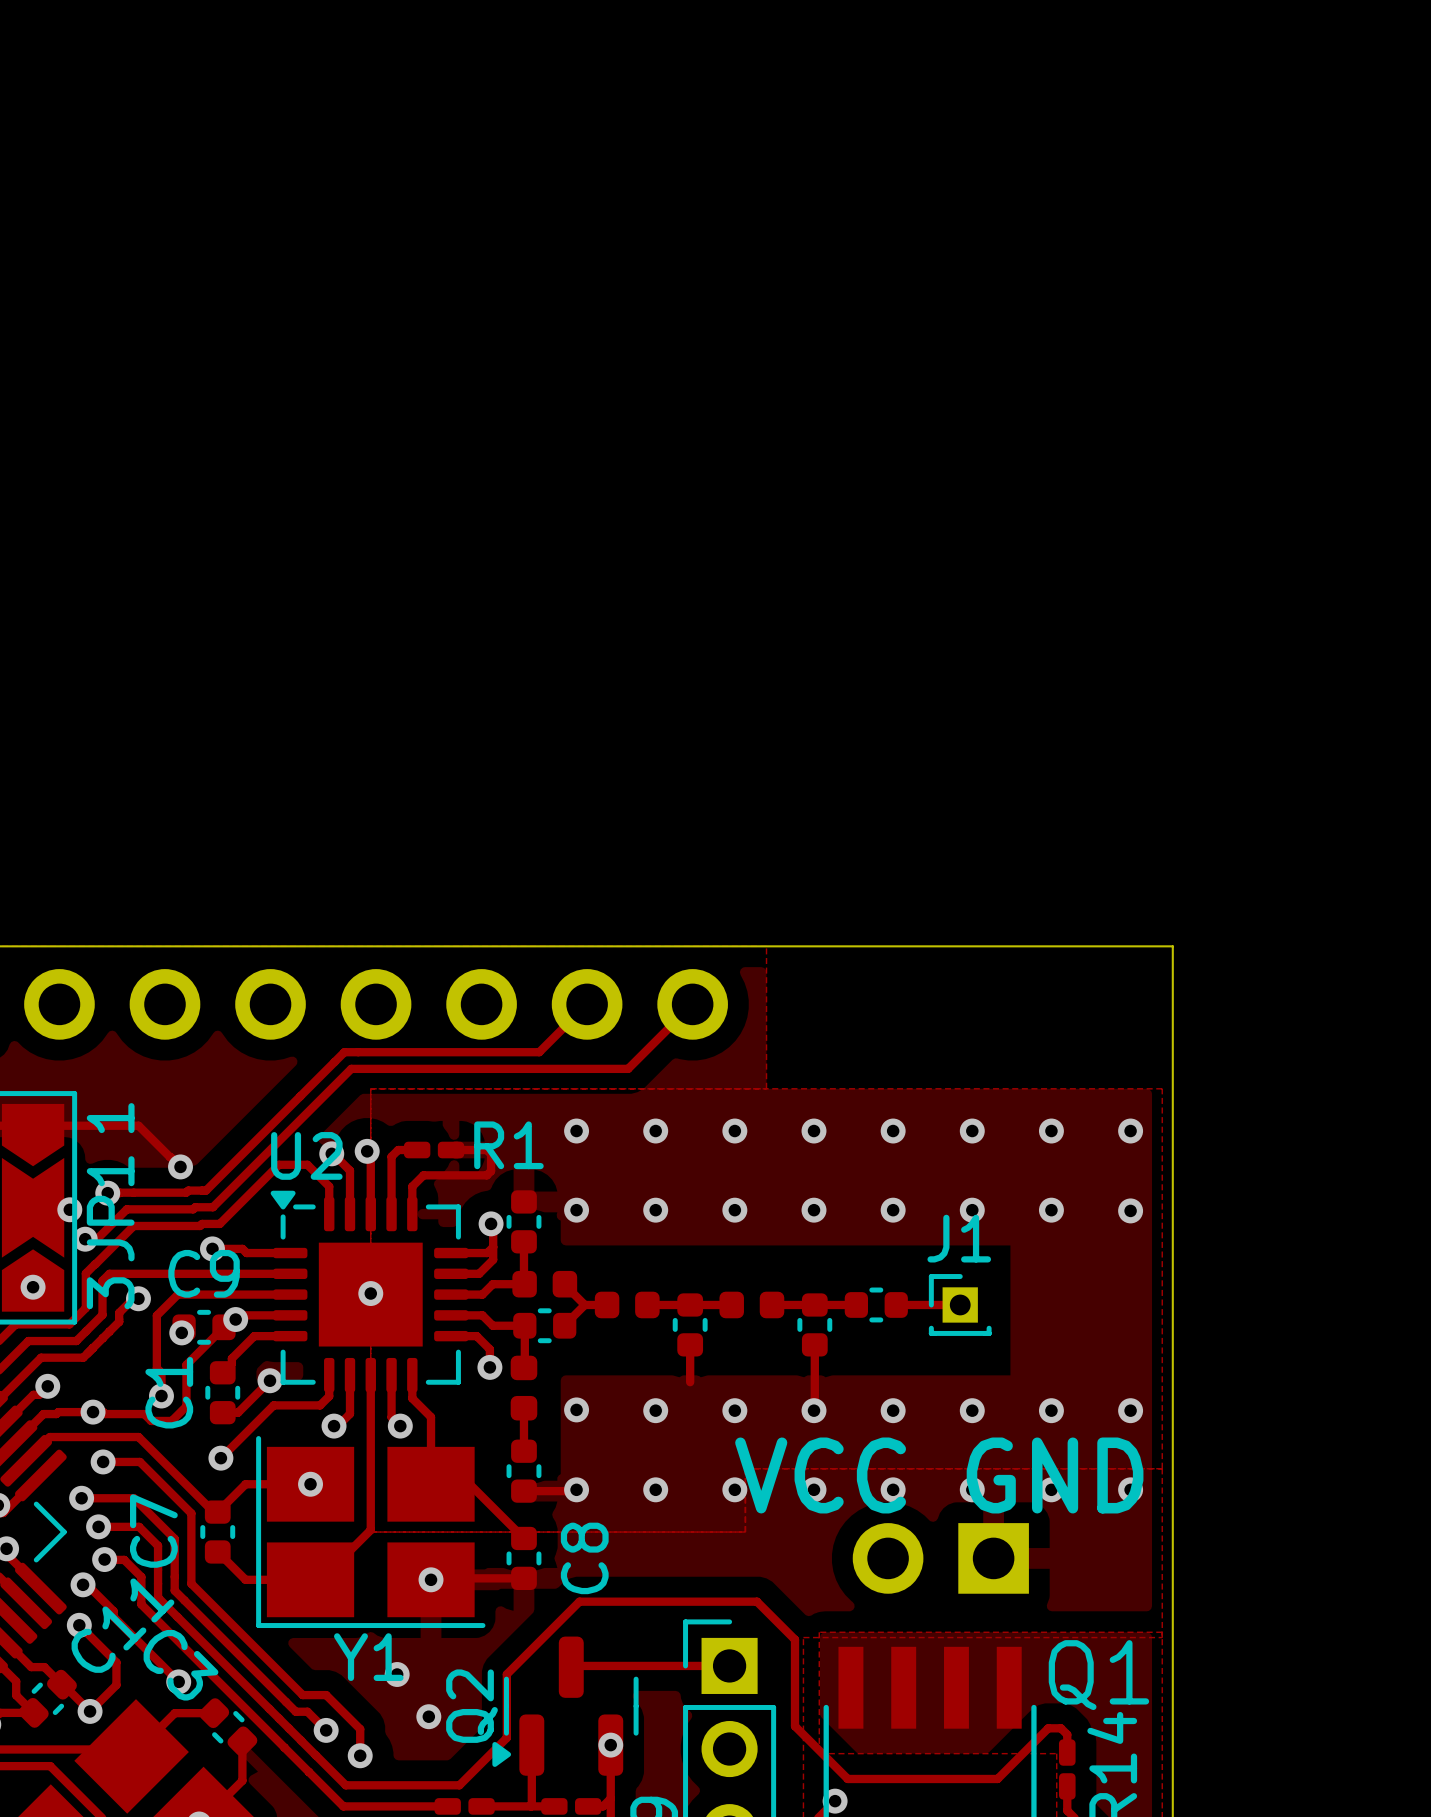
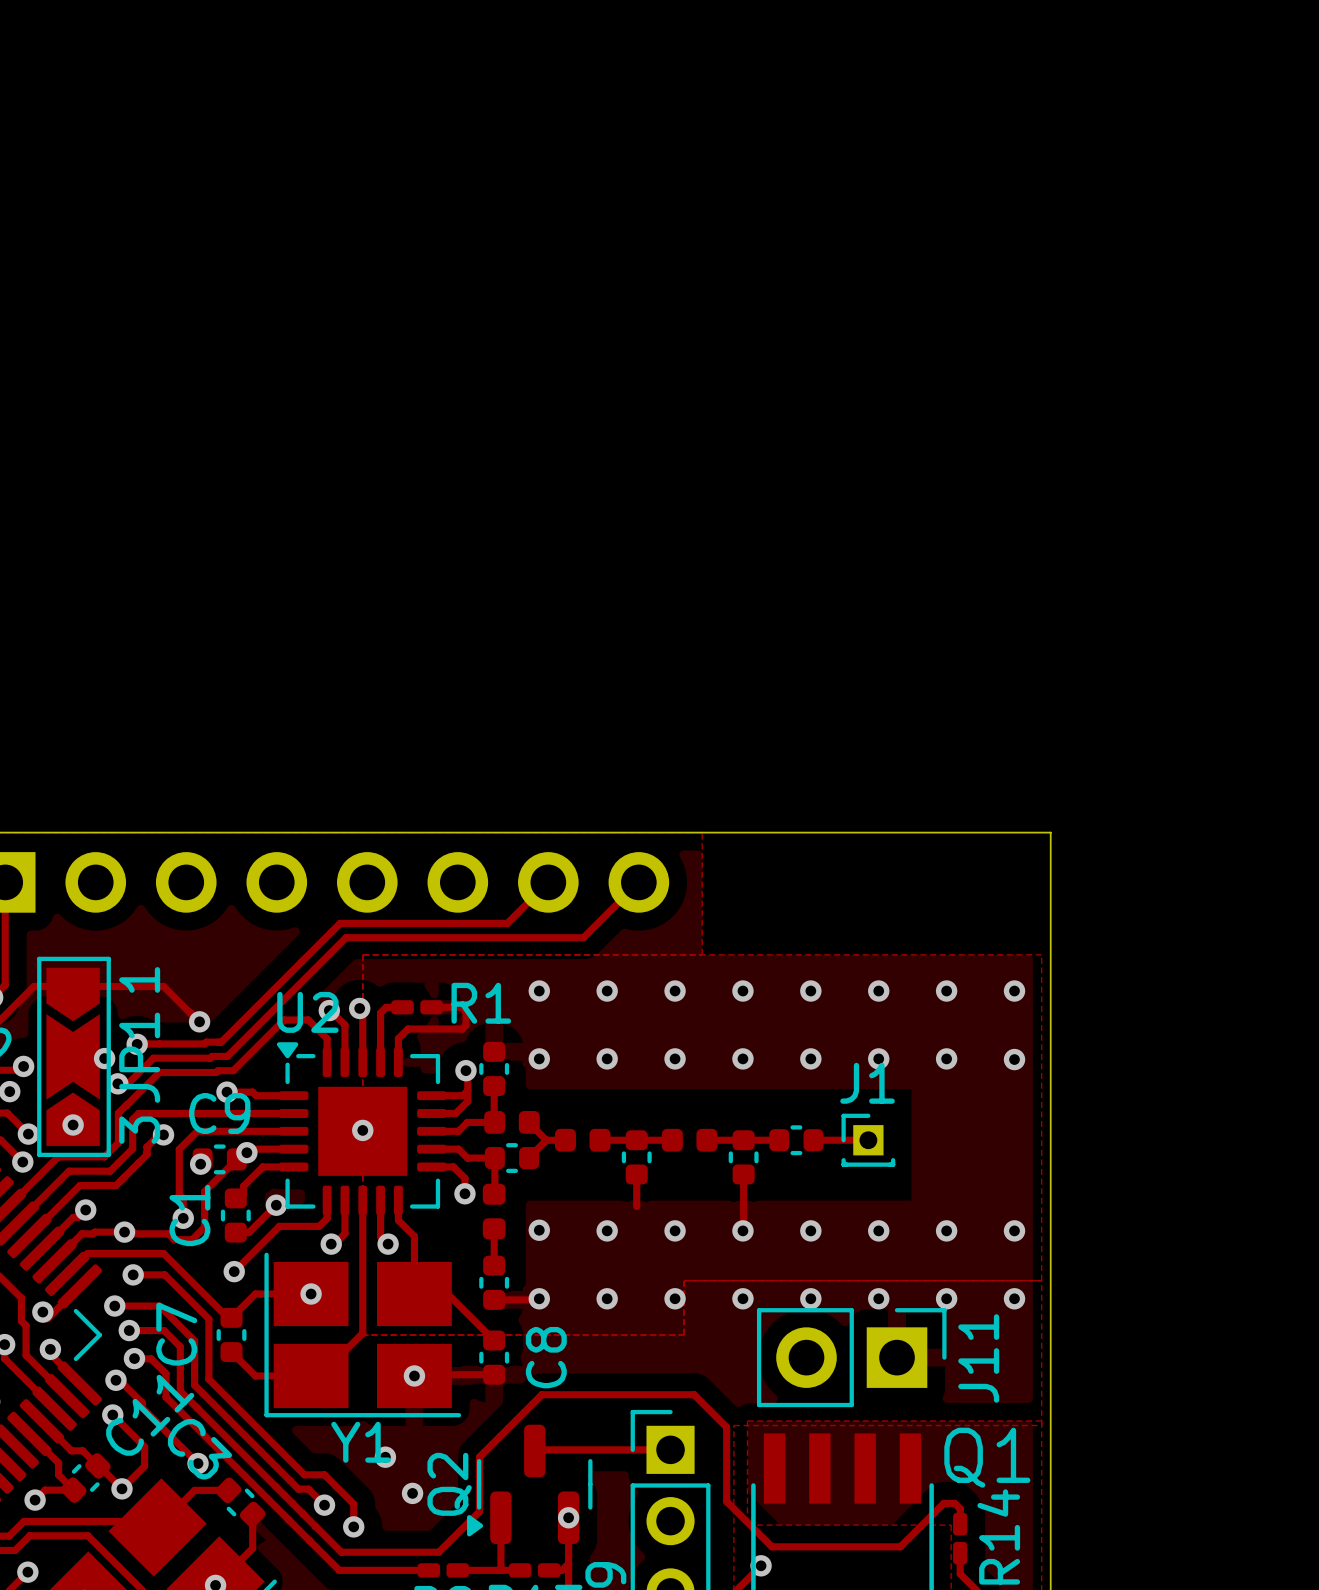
text: VCC (820, 1475) -> none
text: GND (1055, 1475) -> none
J11: none -> (851, 1357)

